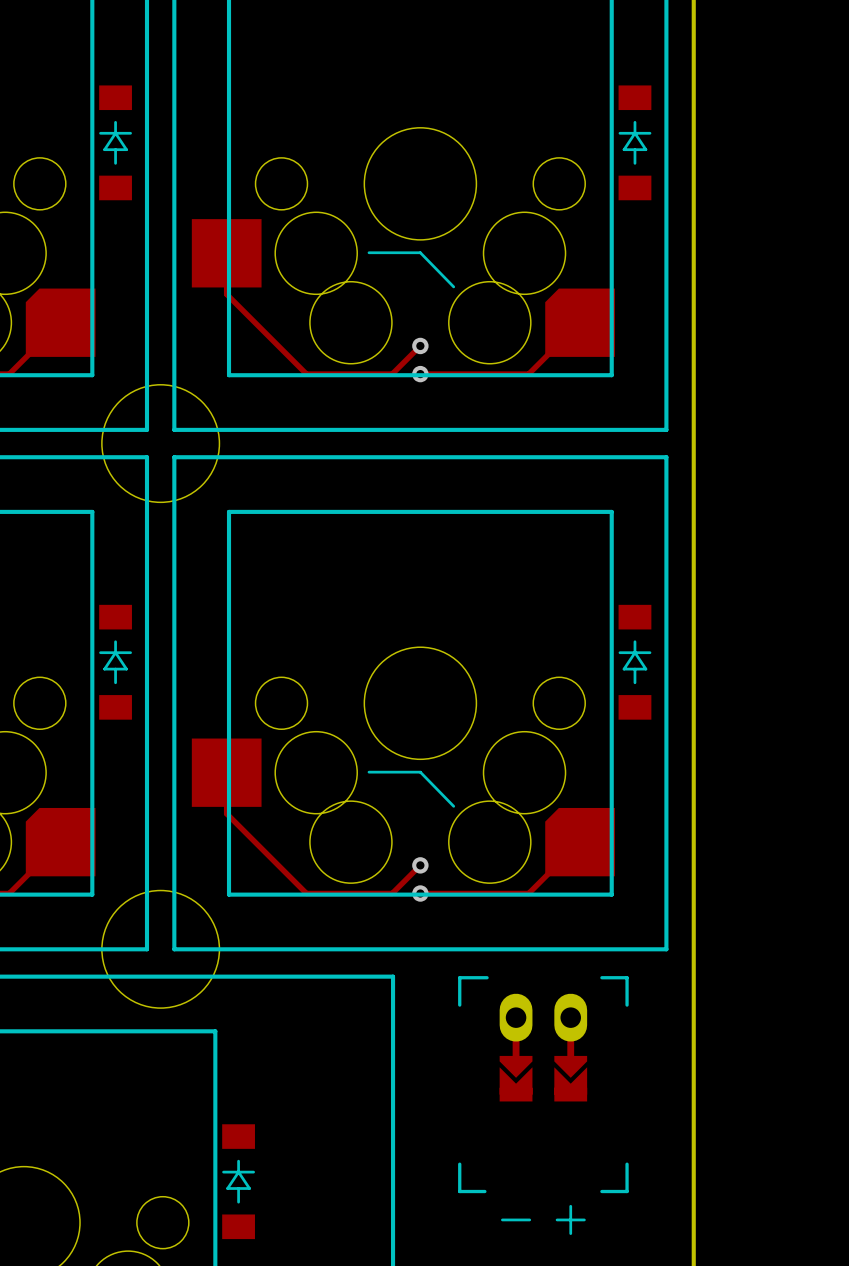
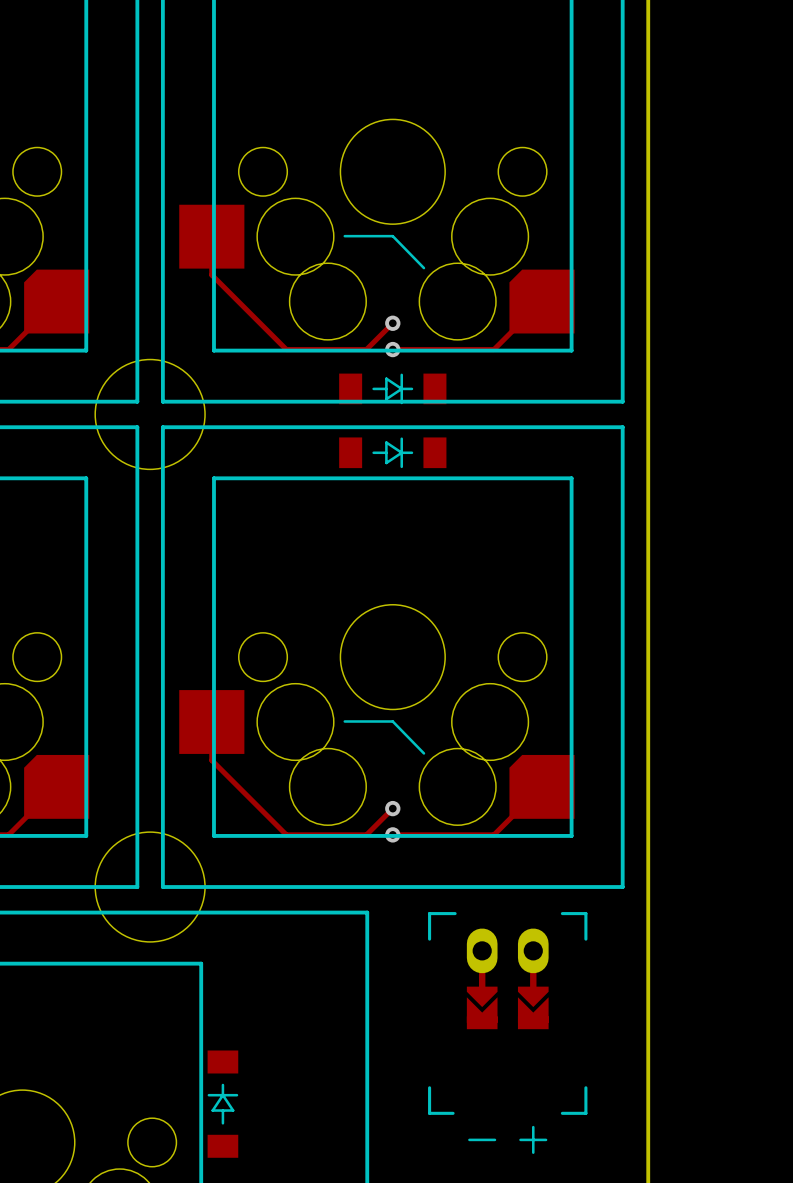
part: (115, 142) -> none
part: (634, 142) -> none
part: none -> (392, 388)
part: none -> (392, 452)
part: (115, 662) -> none
part: (634, 662) -> none

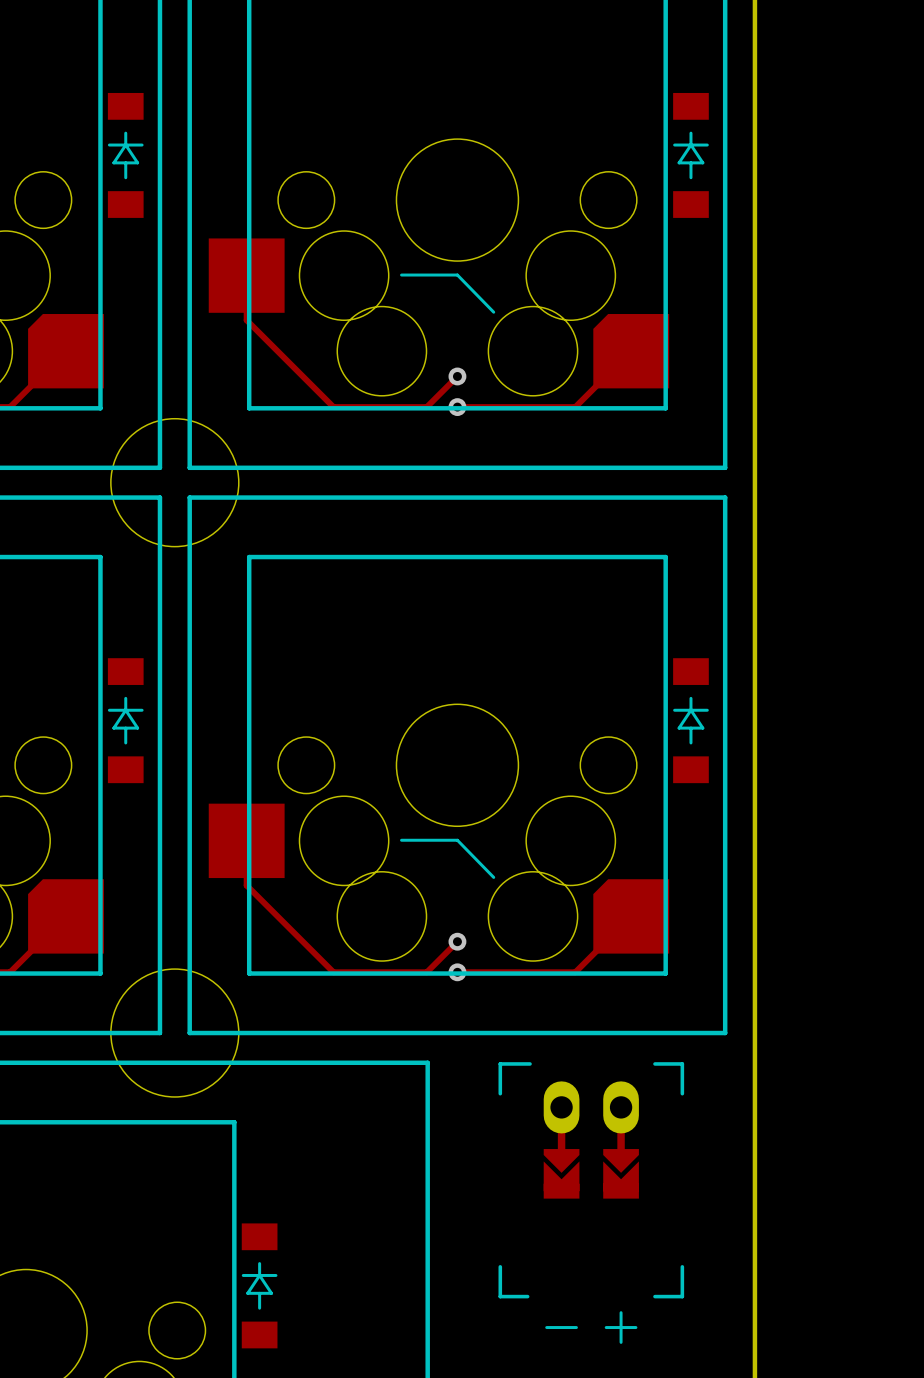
part: none -> (125, 155)
part: none -> (690, 155)
part: (392, 388) -> none
part: (392, 452) -> none
part: none -> (125, 720)
part: none -> (690, 720)

